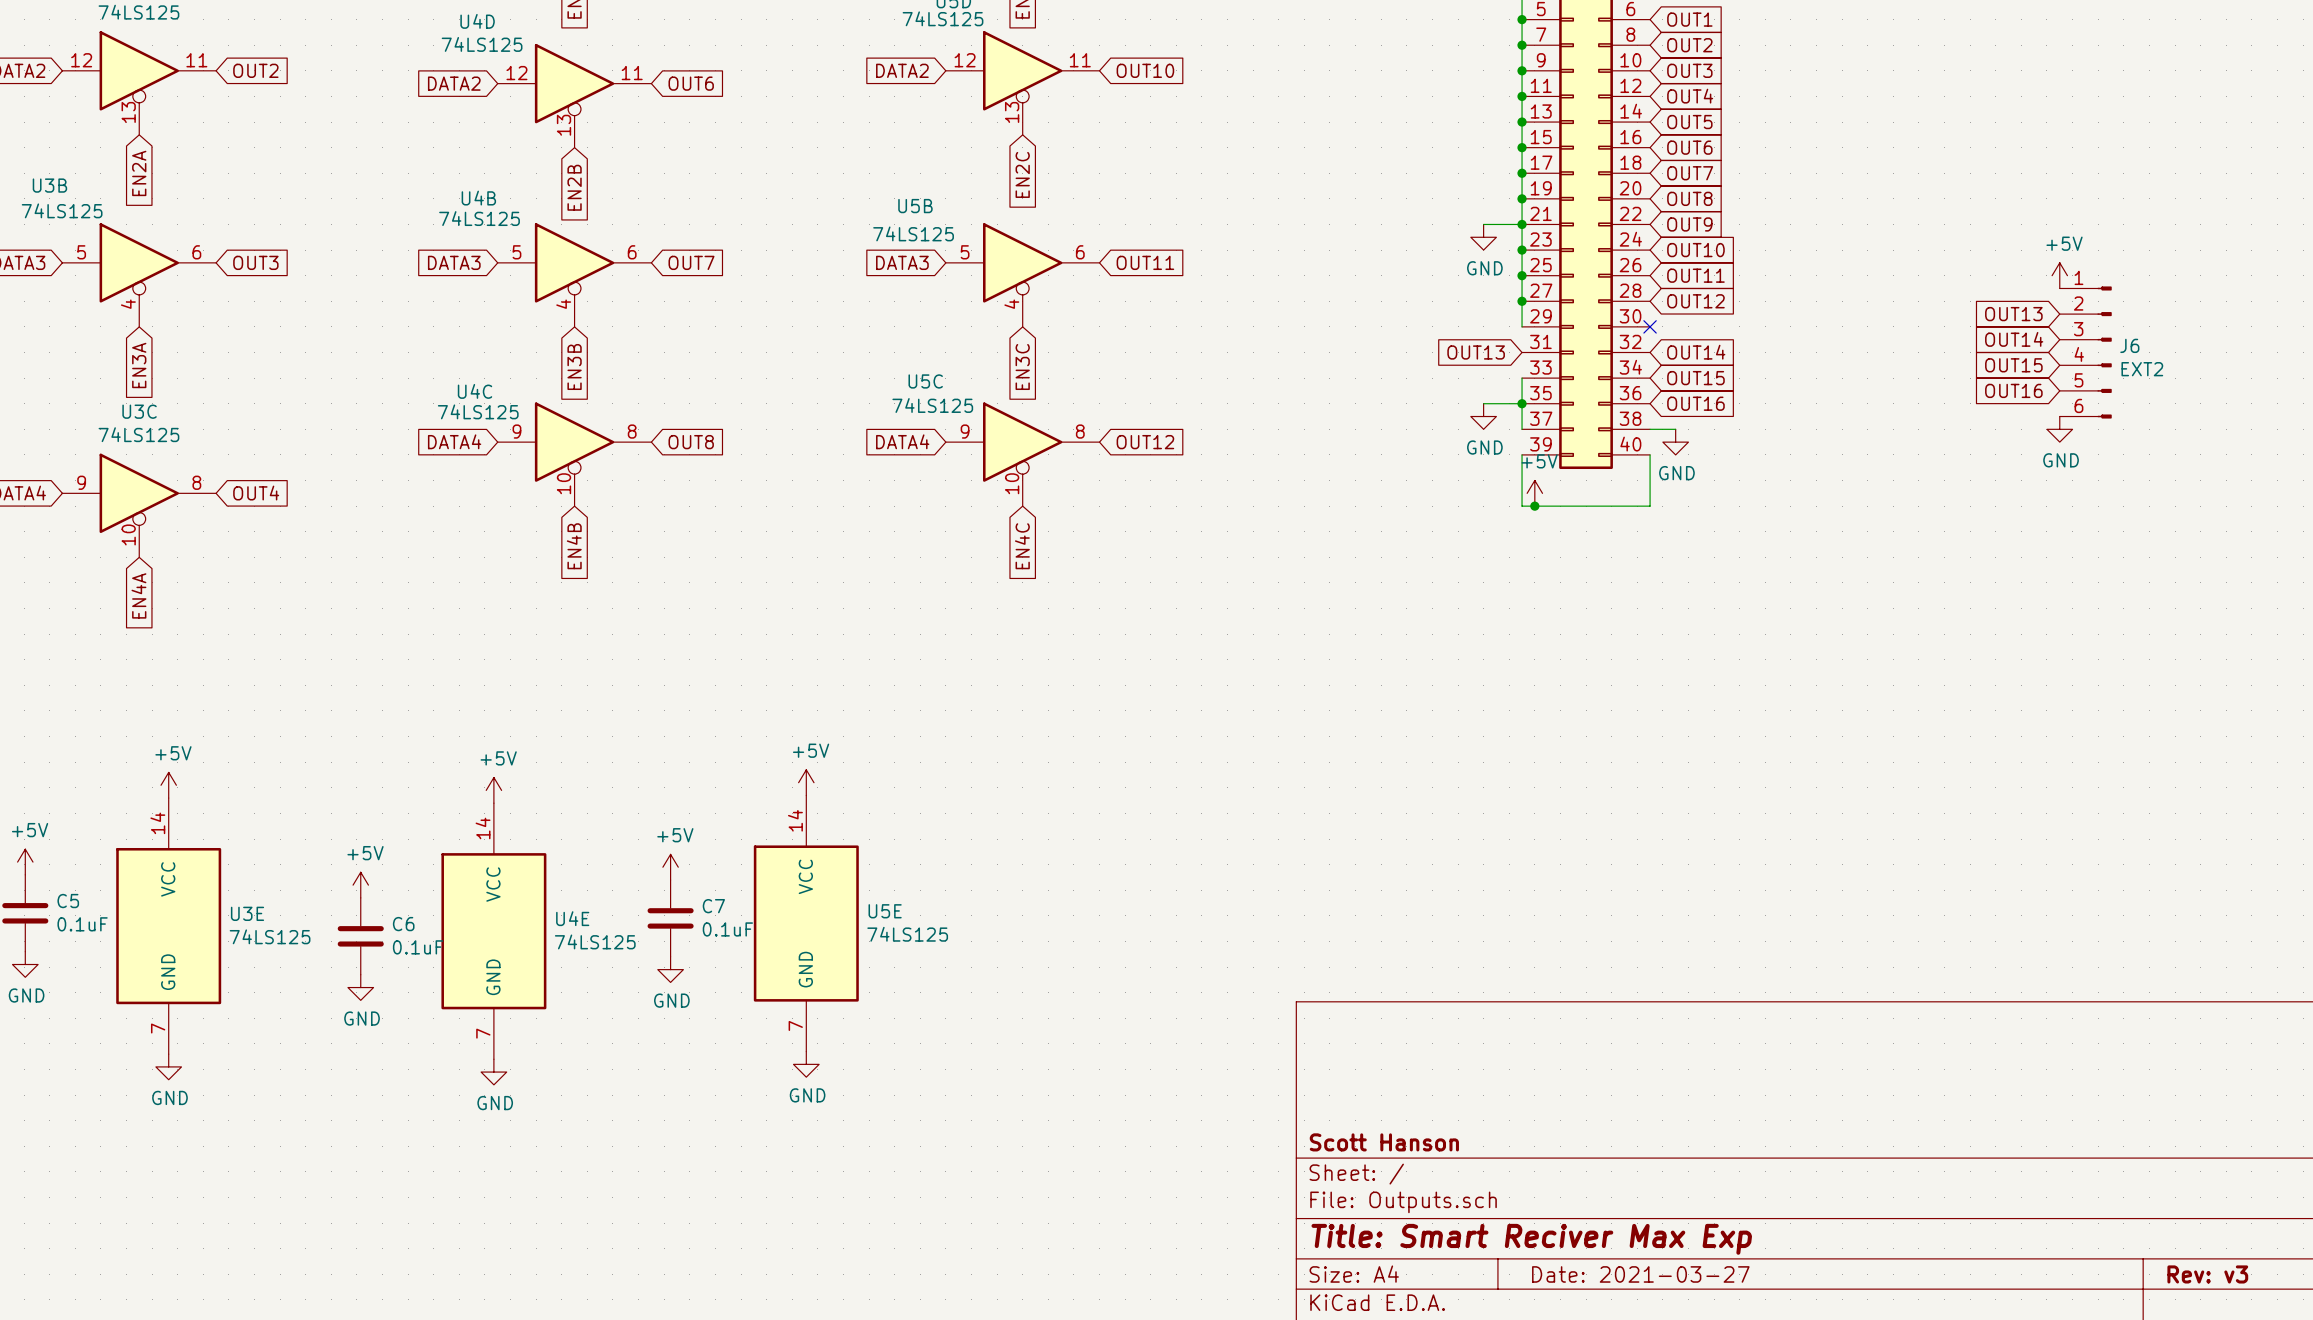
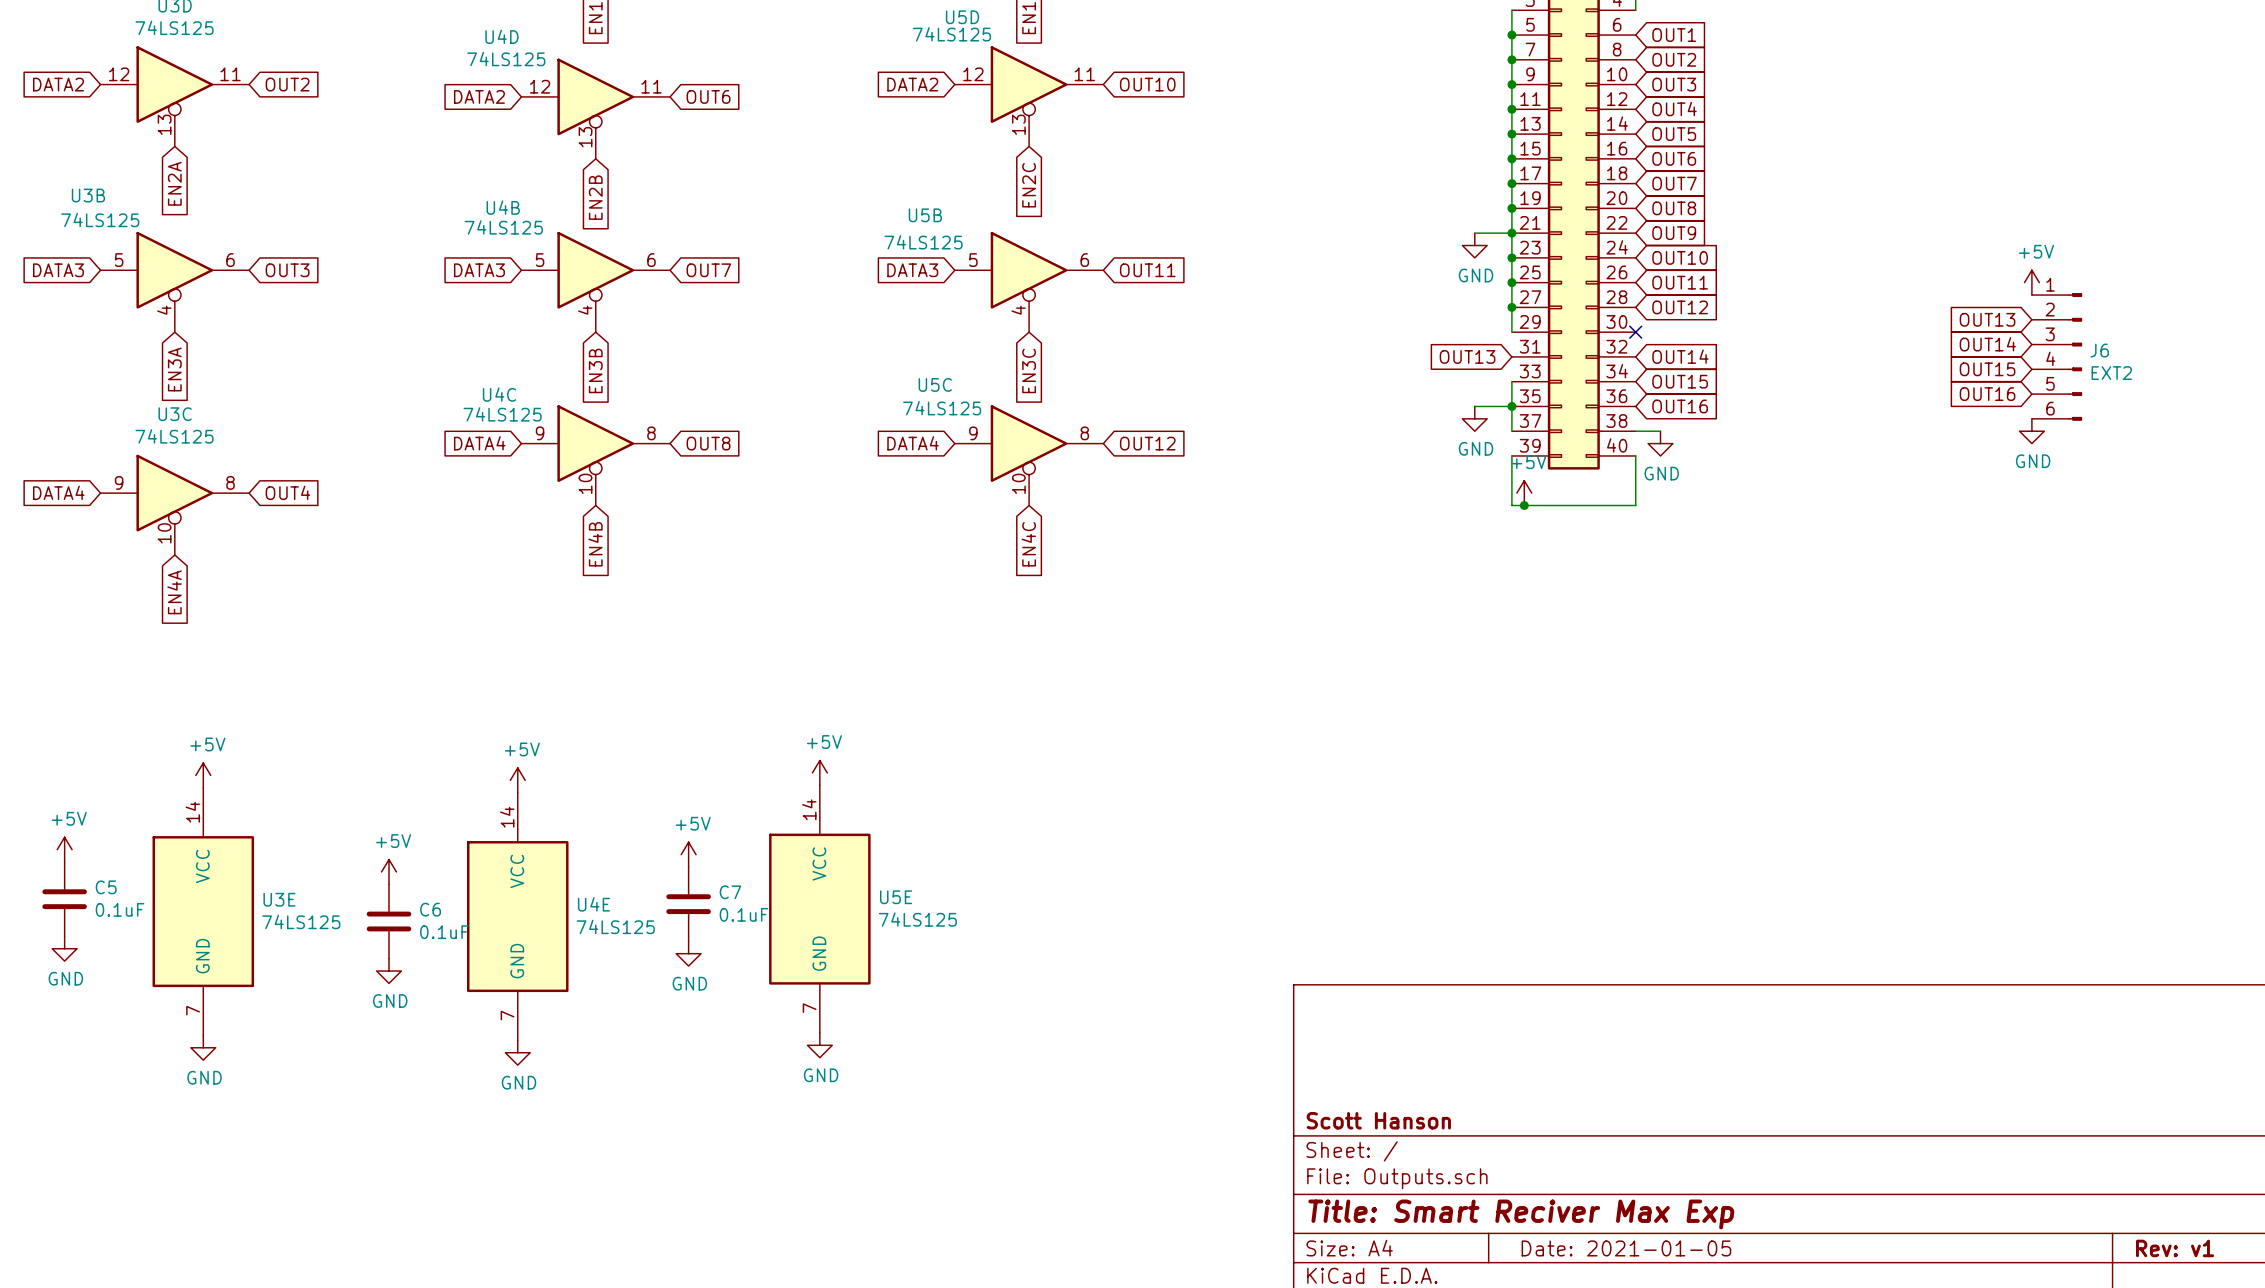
title block: Date: 2021-03-27 (1640, 1274) -> Date: 2021-01-05 (1626, 1248)
title block: Rev: v3 (2207, 1274) -> Rev: v1 (2175, 1248)

